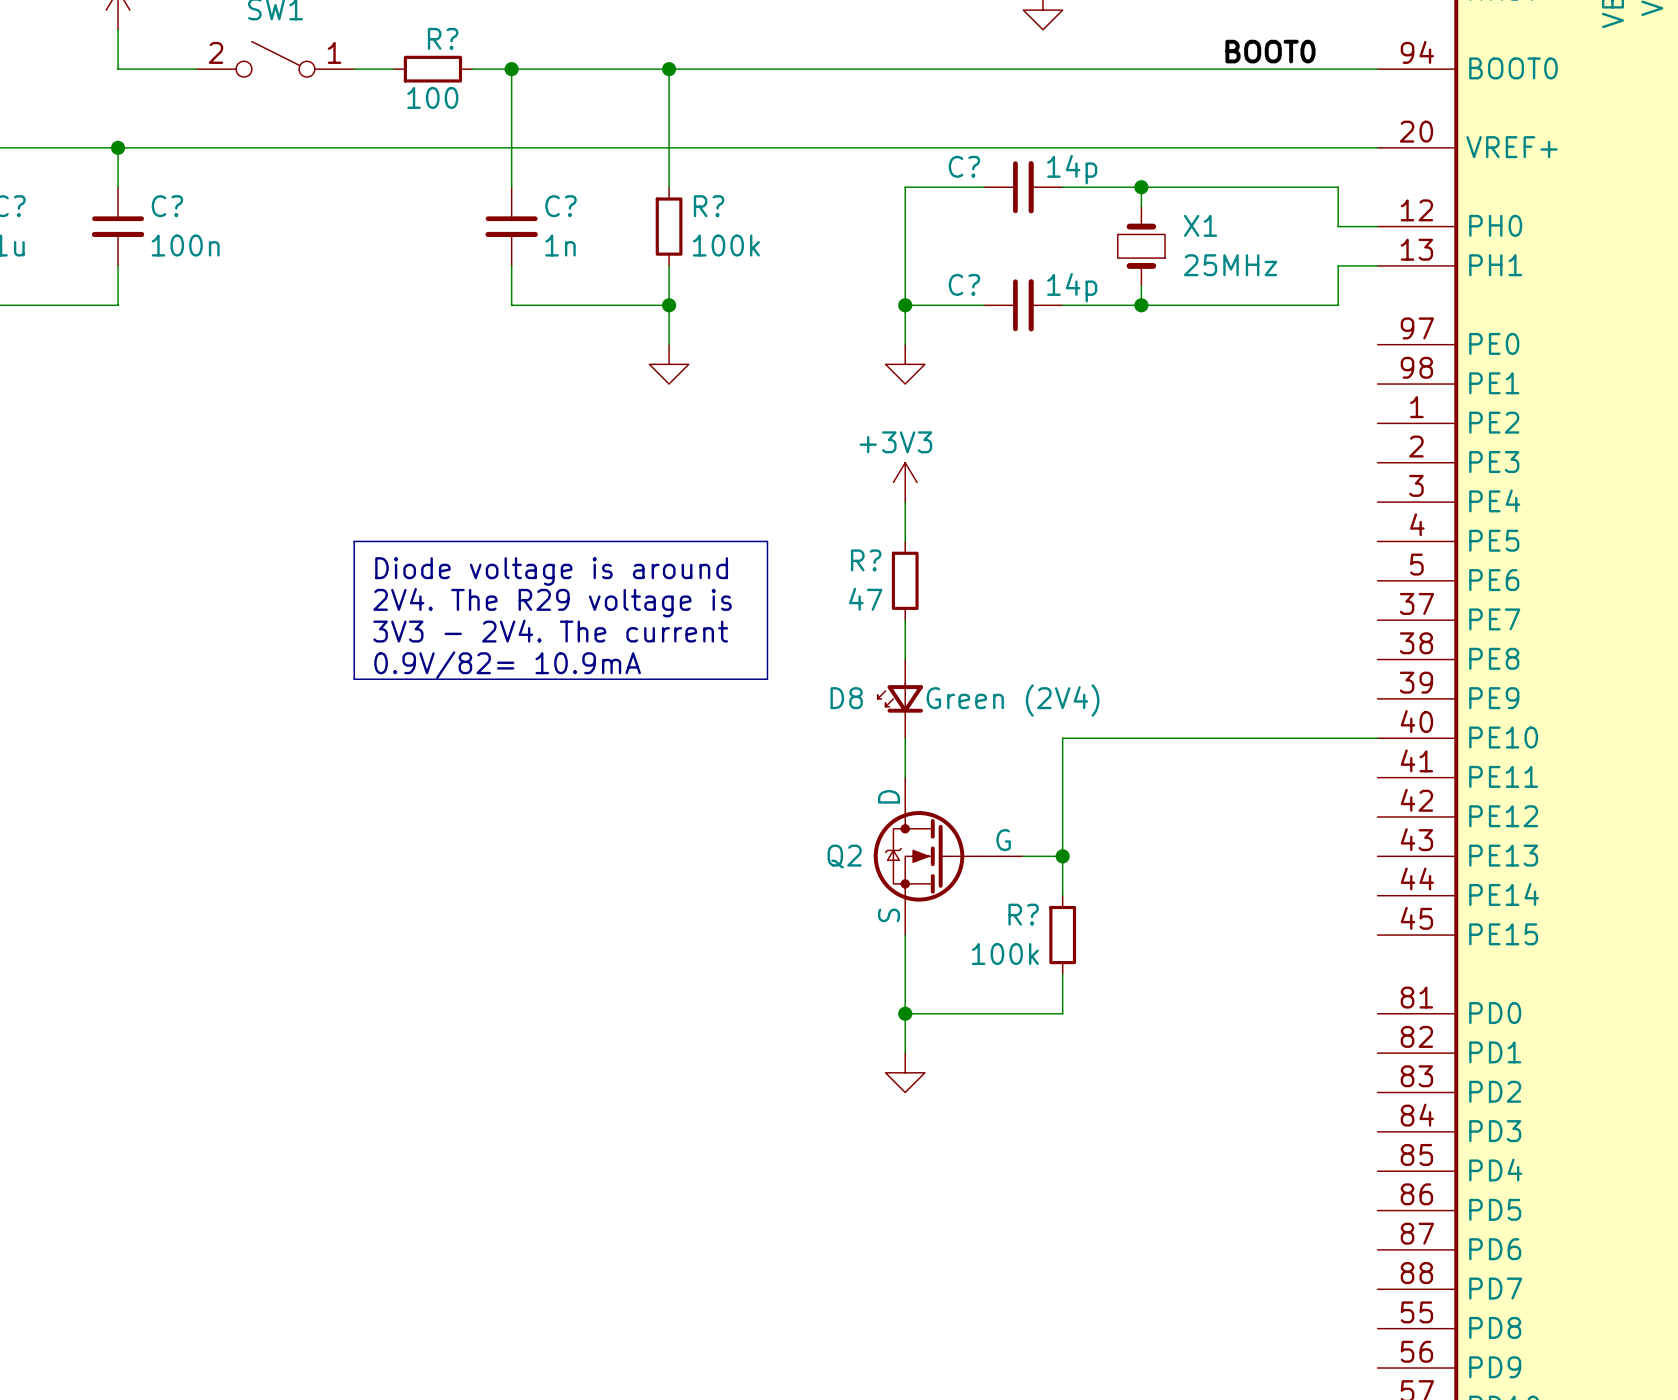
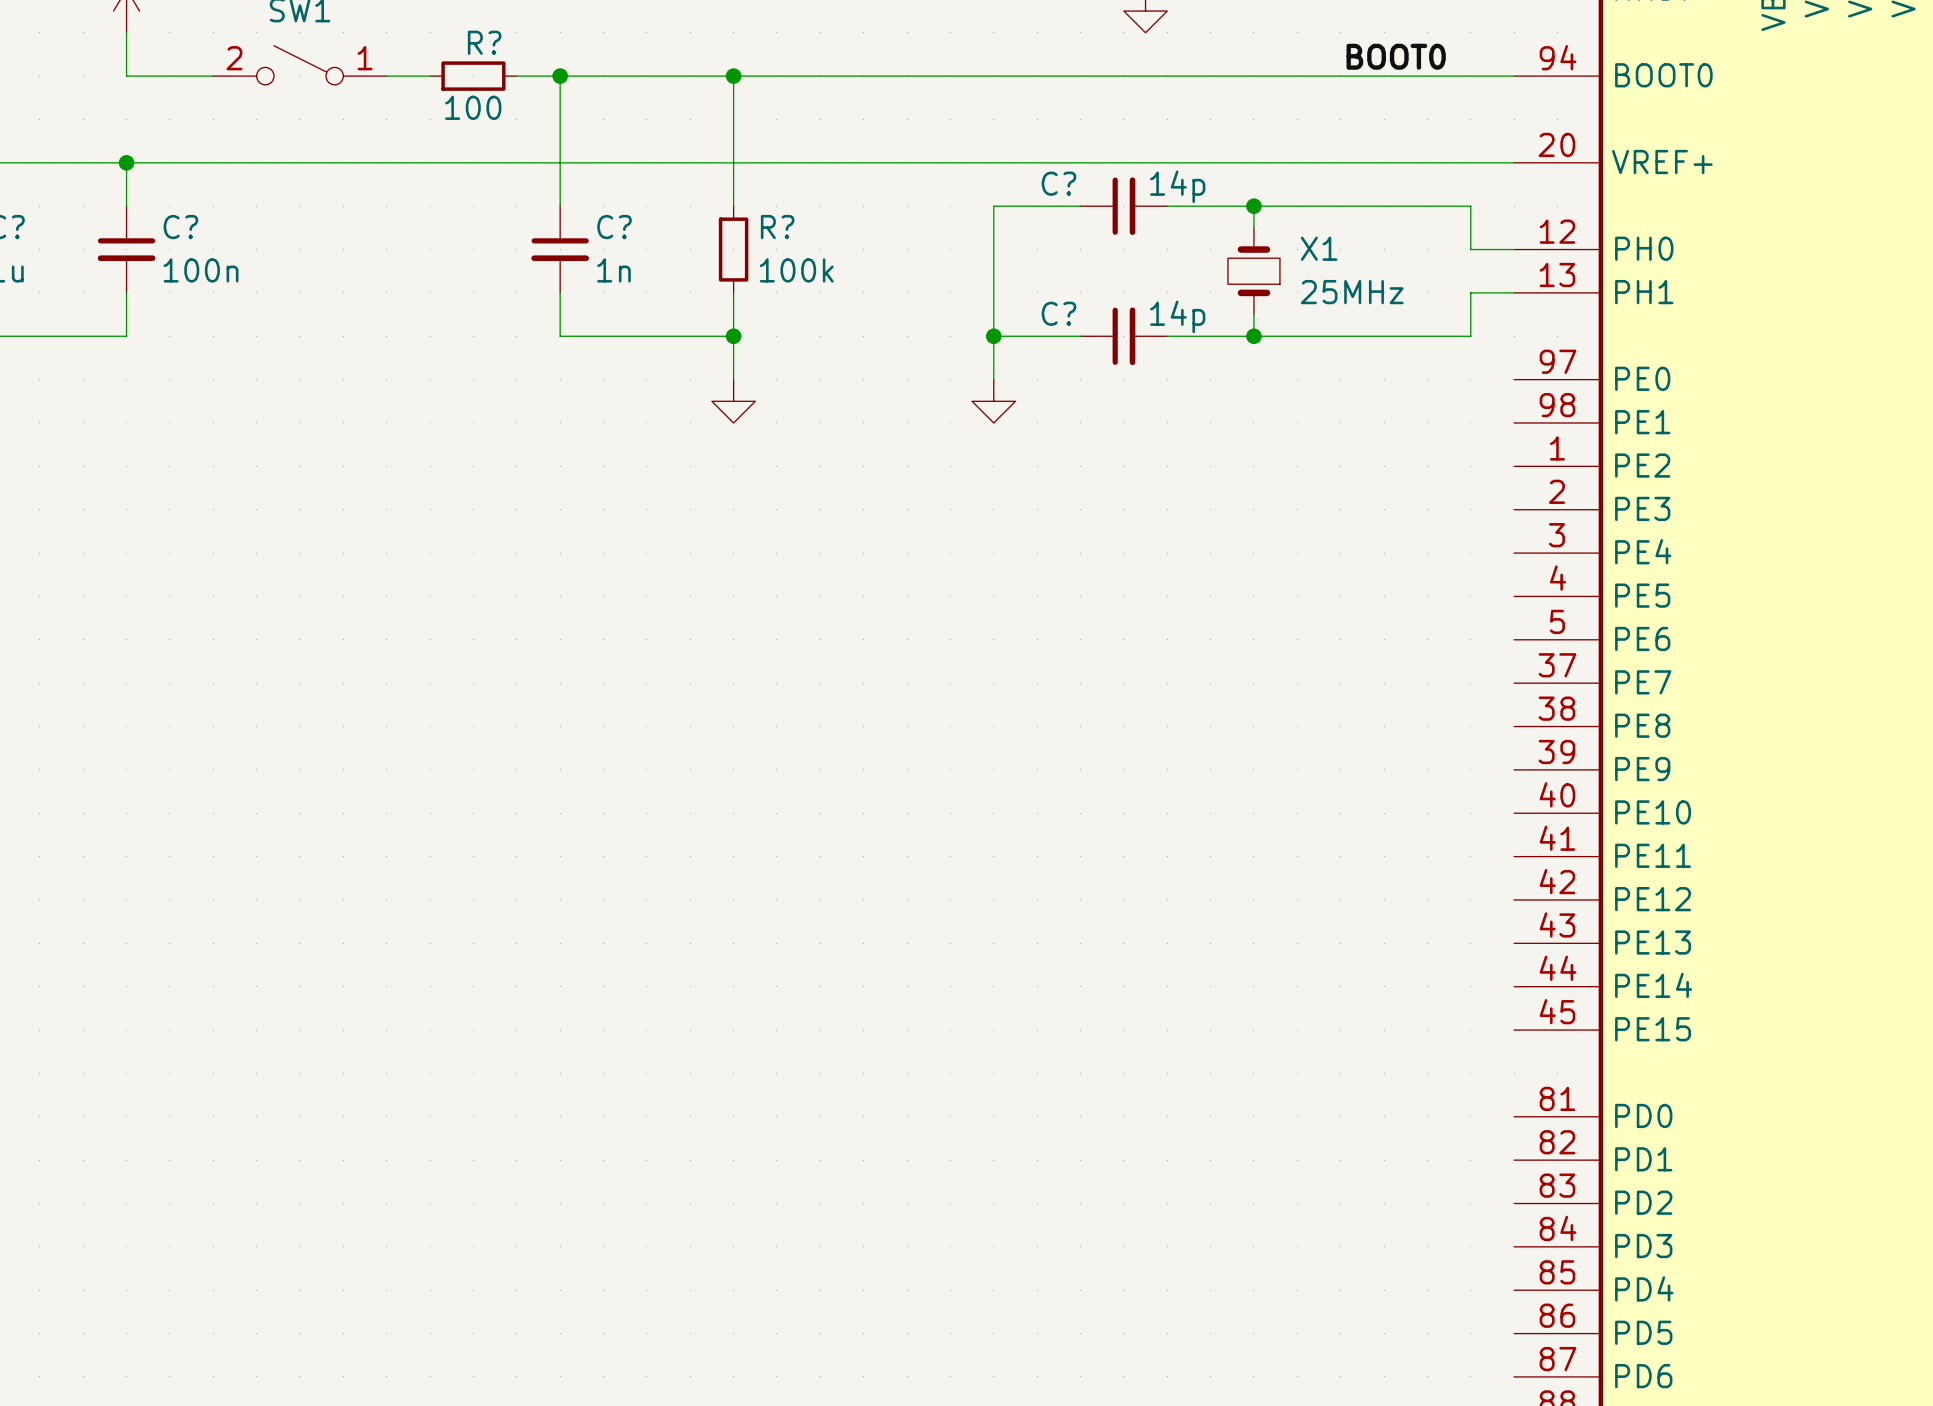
power symbol: +3V3 (905, 482) -> none
wire: (905, 502) (905, 541) -> none
line: (354, 541) (767, 541) (767, 679) (354, 679) (354, 541) -> none
text: Diode voltage is around (551, 571) -> none
R?: 47 (905, 580) -> none
text: 2V4. The R29 voltage is (552, 602) -> none
wire: (905, 620) (905, 659) -> none
text: 3V3 - 2V4. The current (550, 631) -> none
text: 0.9V/82= 10.9mA (507, 665) -> none
D8: Green (2V4) (900, 698) -> none
wire: (905, 738) (905, 777) -> none
wire: (1377, 738) (1062, 738) (1062, 895) -> none
Q2: (948, 856) -> none
wire: (1023, 856) (1062, 856) -> none
junction: (1062, 856) -> none
wire: (905, 935) (905, 1053) -> none
R?: 100k (1062, 935) -> none
wire: (1062, 974) (1062, 1013) (905, 1013) -> none
junction: (905, 1013) -> none
power symbol: (905, 1072) -> none

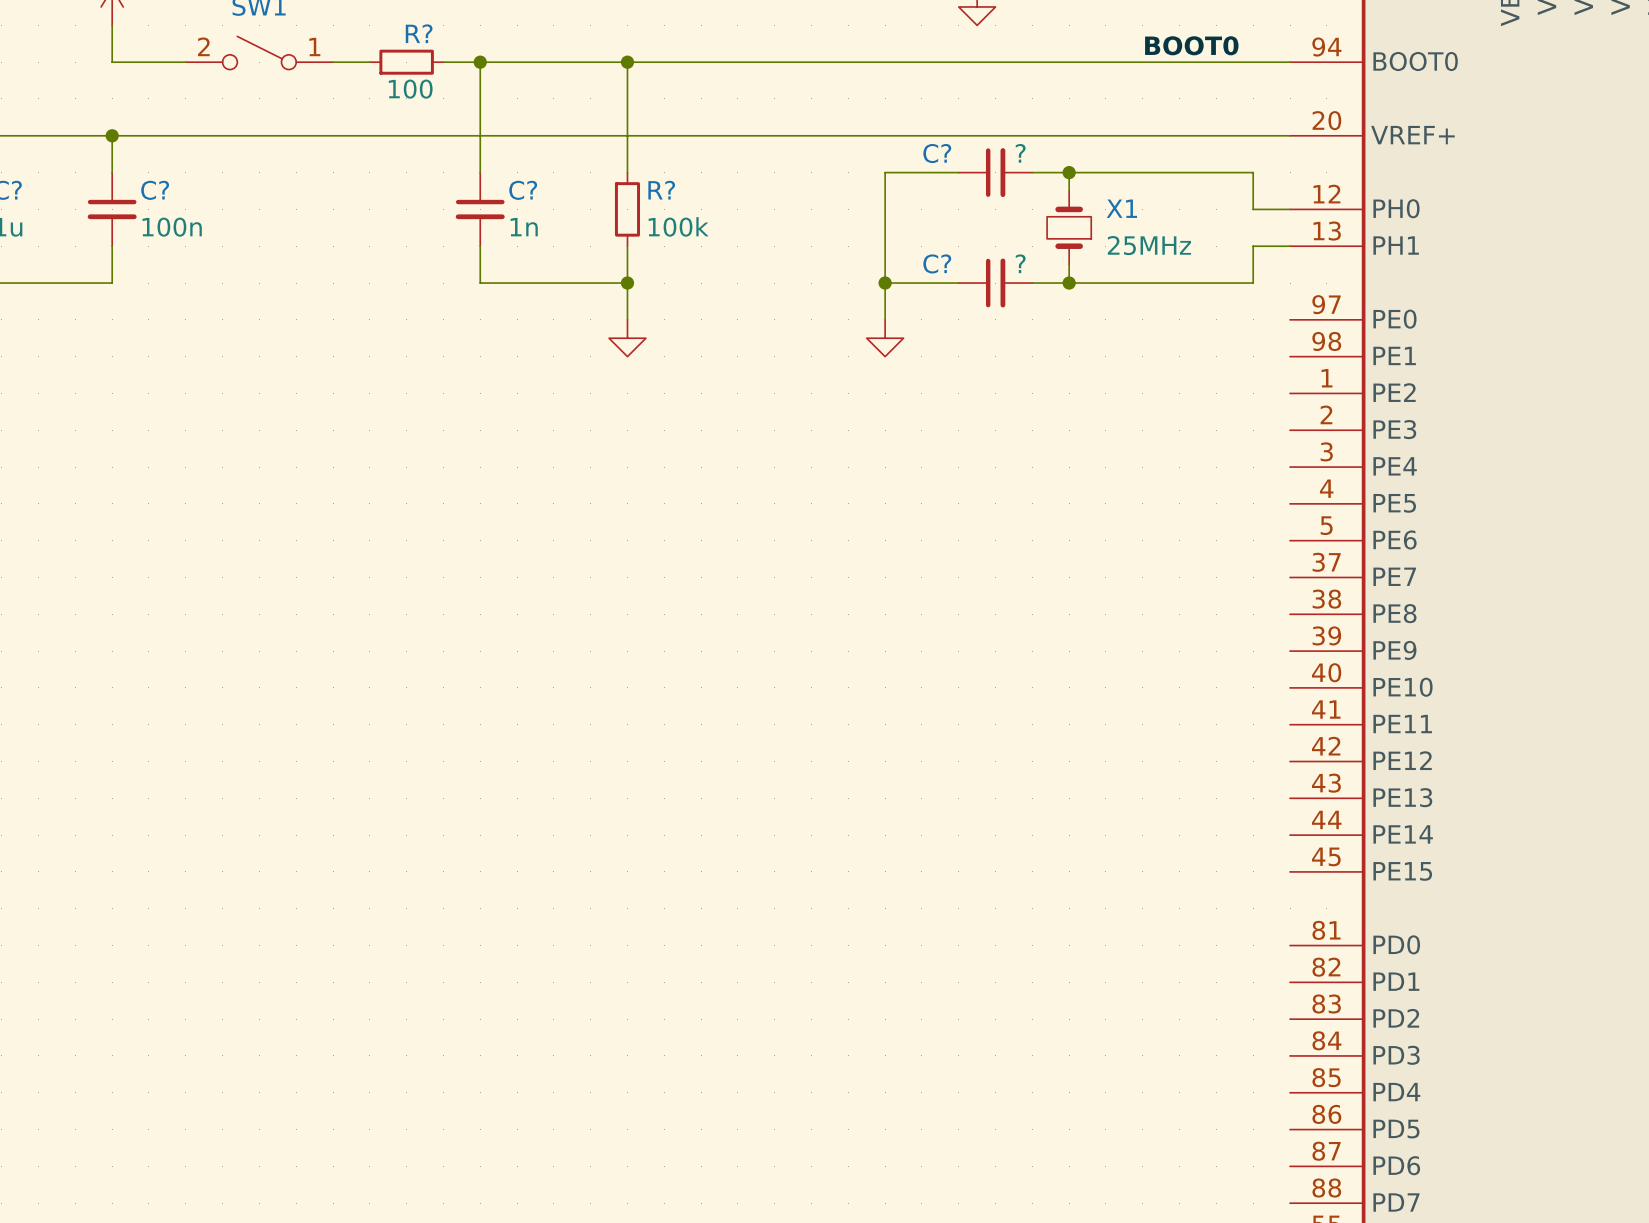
wire: (1037, 206) (993, 206) (993, 379) -> (885, 172) (885, 319)
C?: 14p (1123, 206) -> none
C?: none -> ? (995, 172)
wire: (993, 336) (1037, 336) -> none
junction position: (993, 336) -> (885, 283)
C?: 14p (1123, 336) -> none
C?: none -> ? (995, 283)
power symbol position: (993, 401) -> (885, 338)

